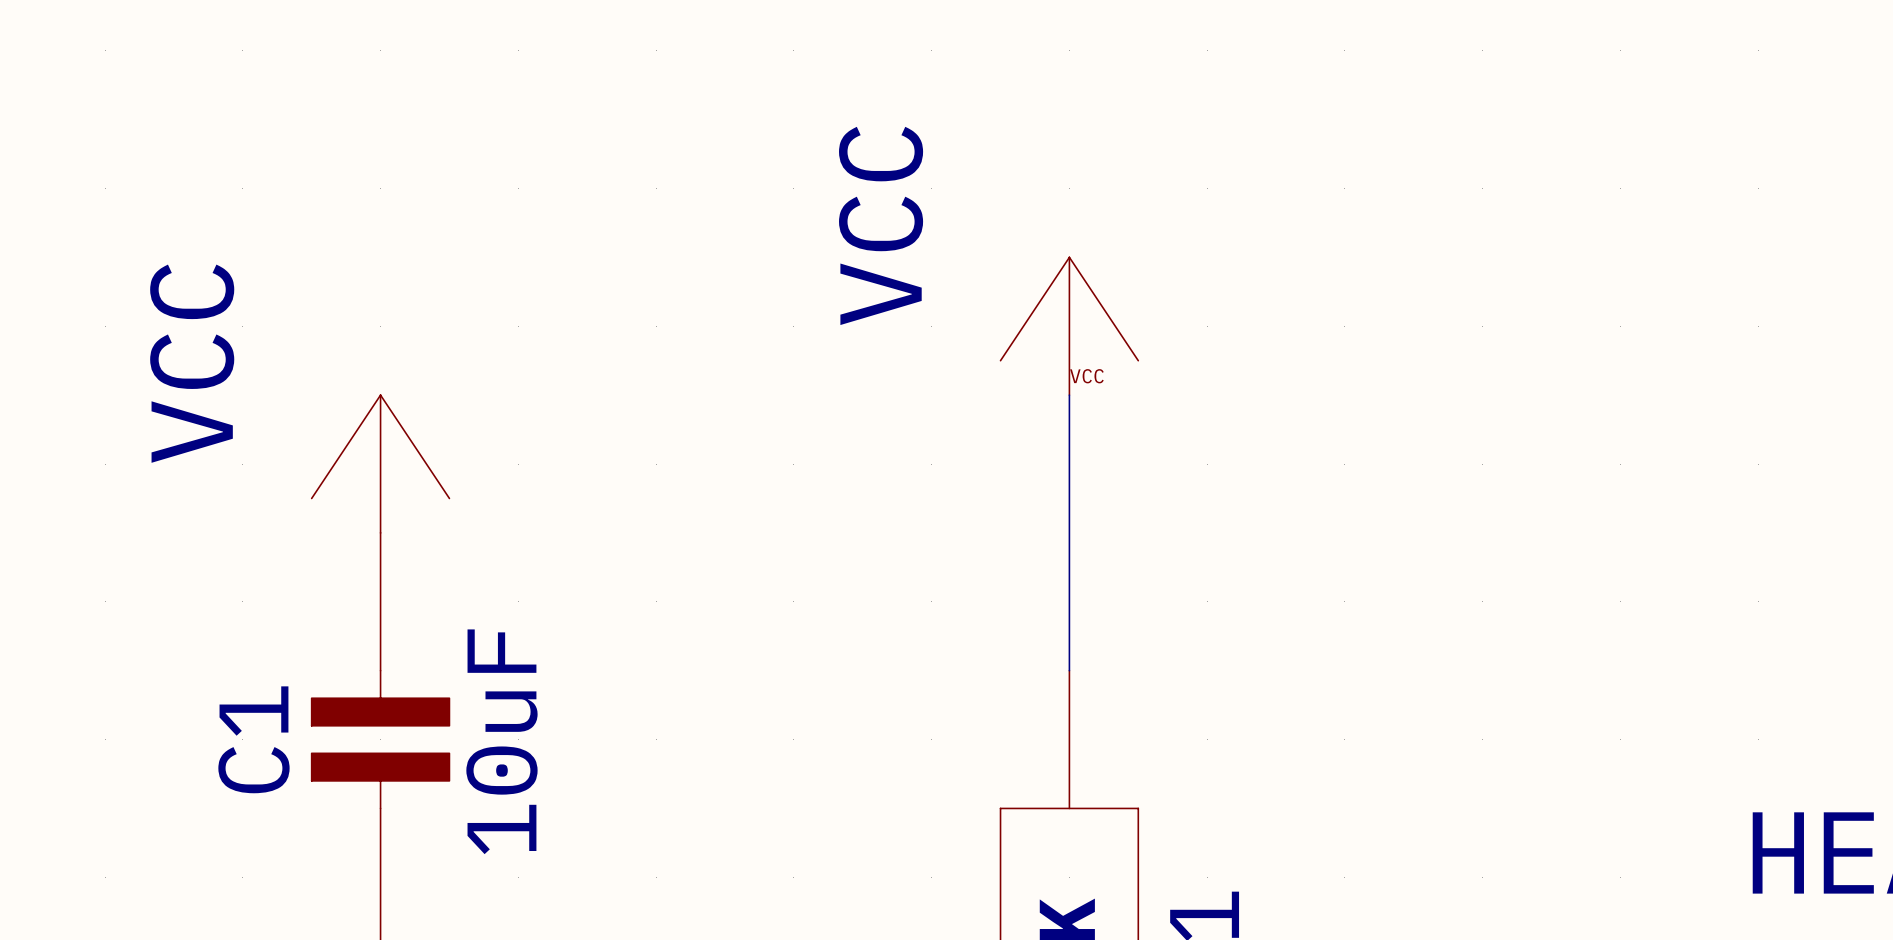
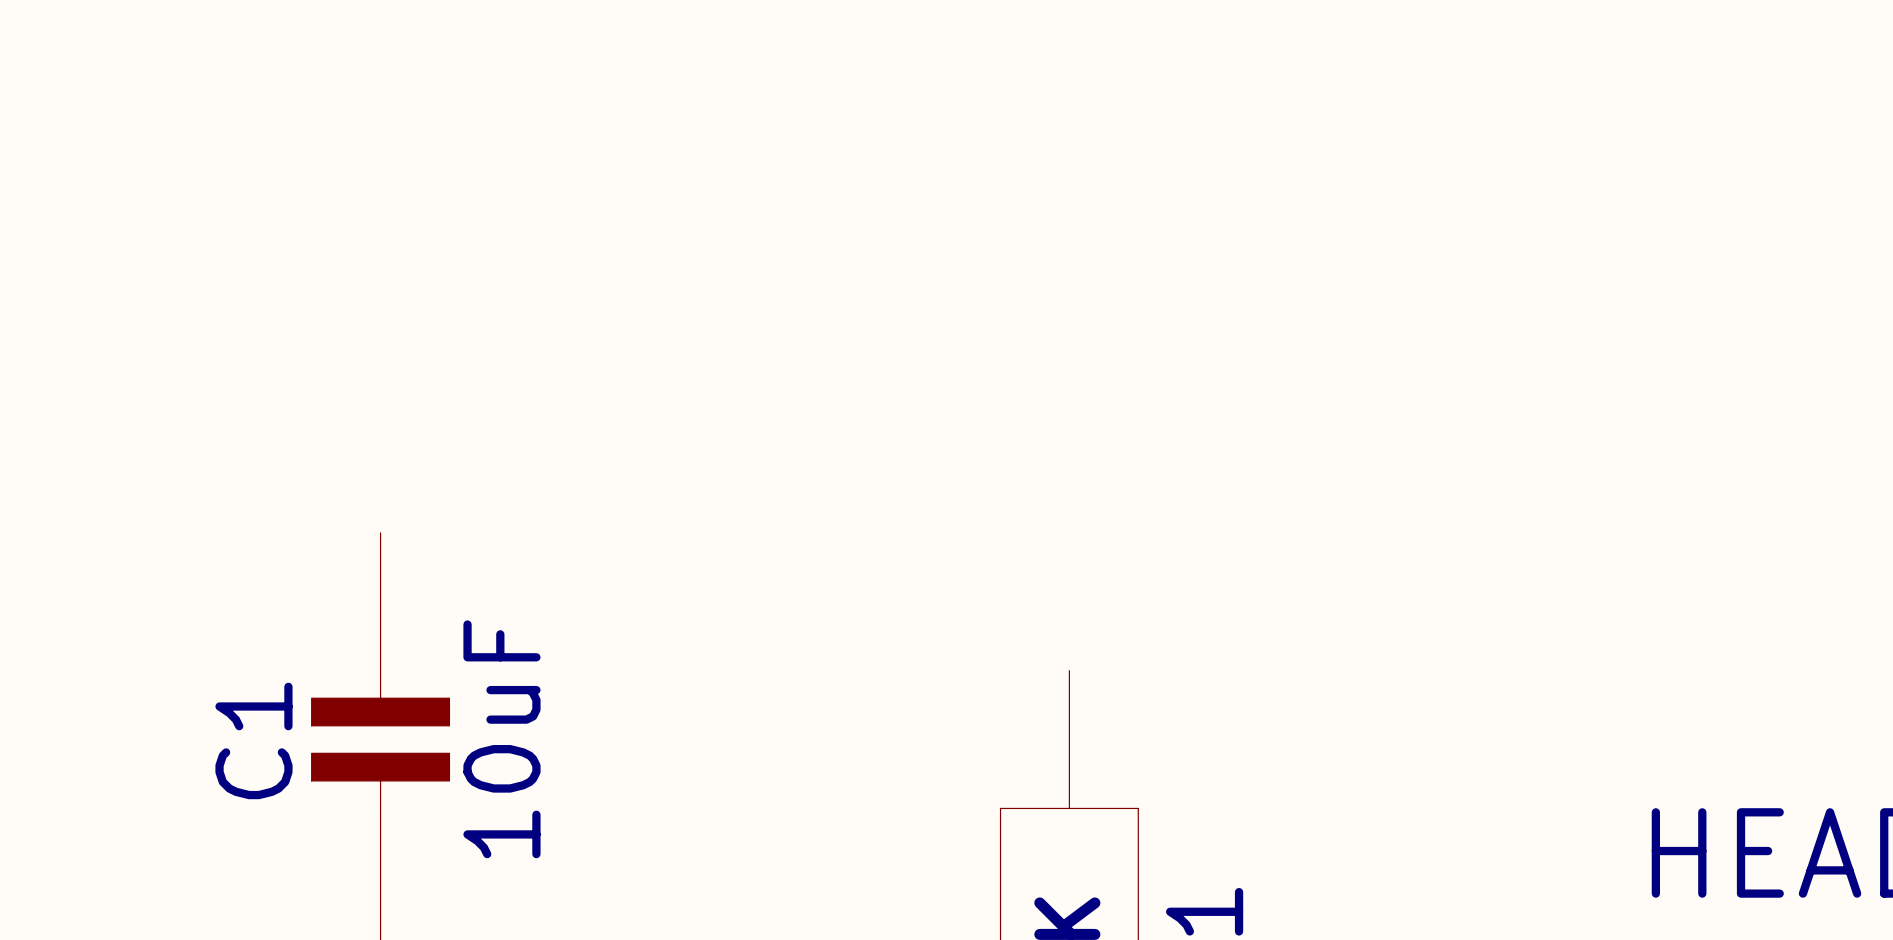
power symbol: VCC (1069, 326) -> none
label: VCC (1086, 376) -> none
wire: (1069, 395) (1069, 670) -> none
power symbol: VCC (380, 464) -> none

